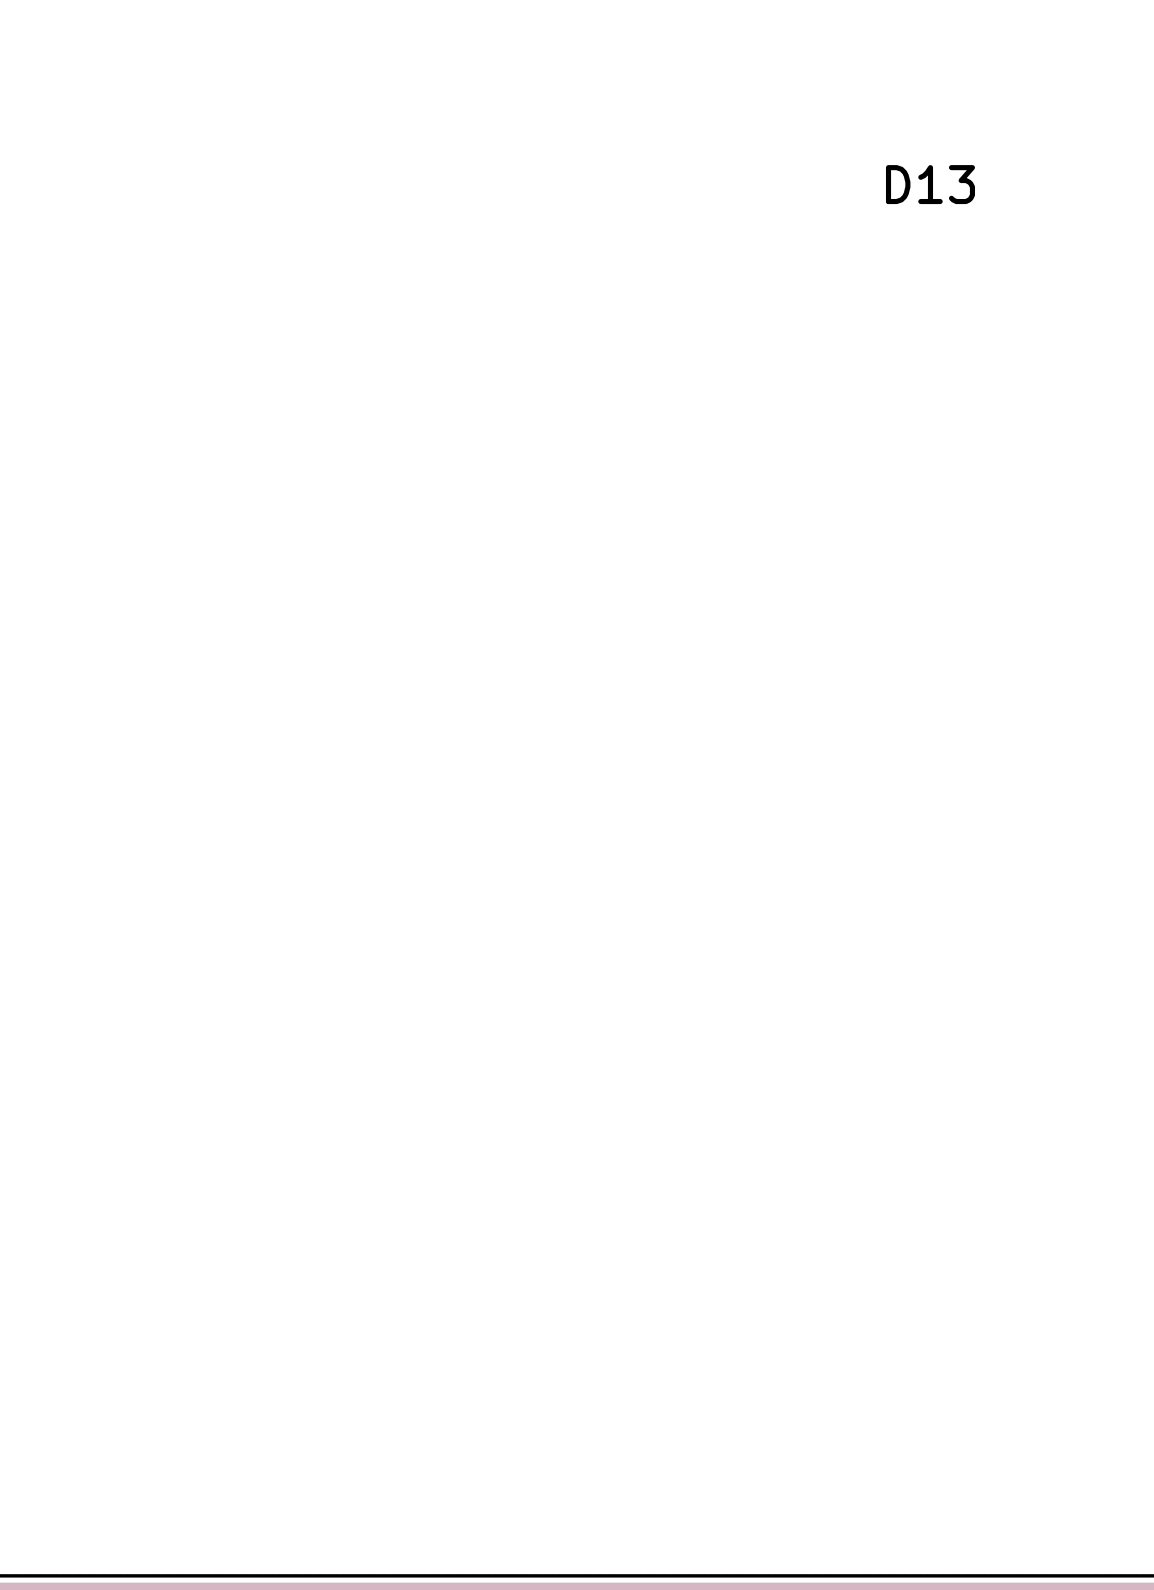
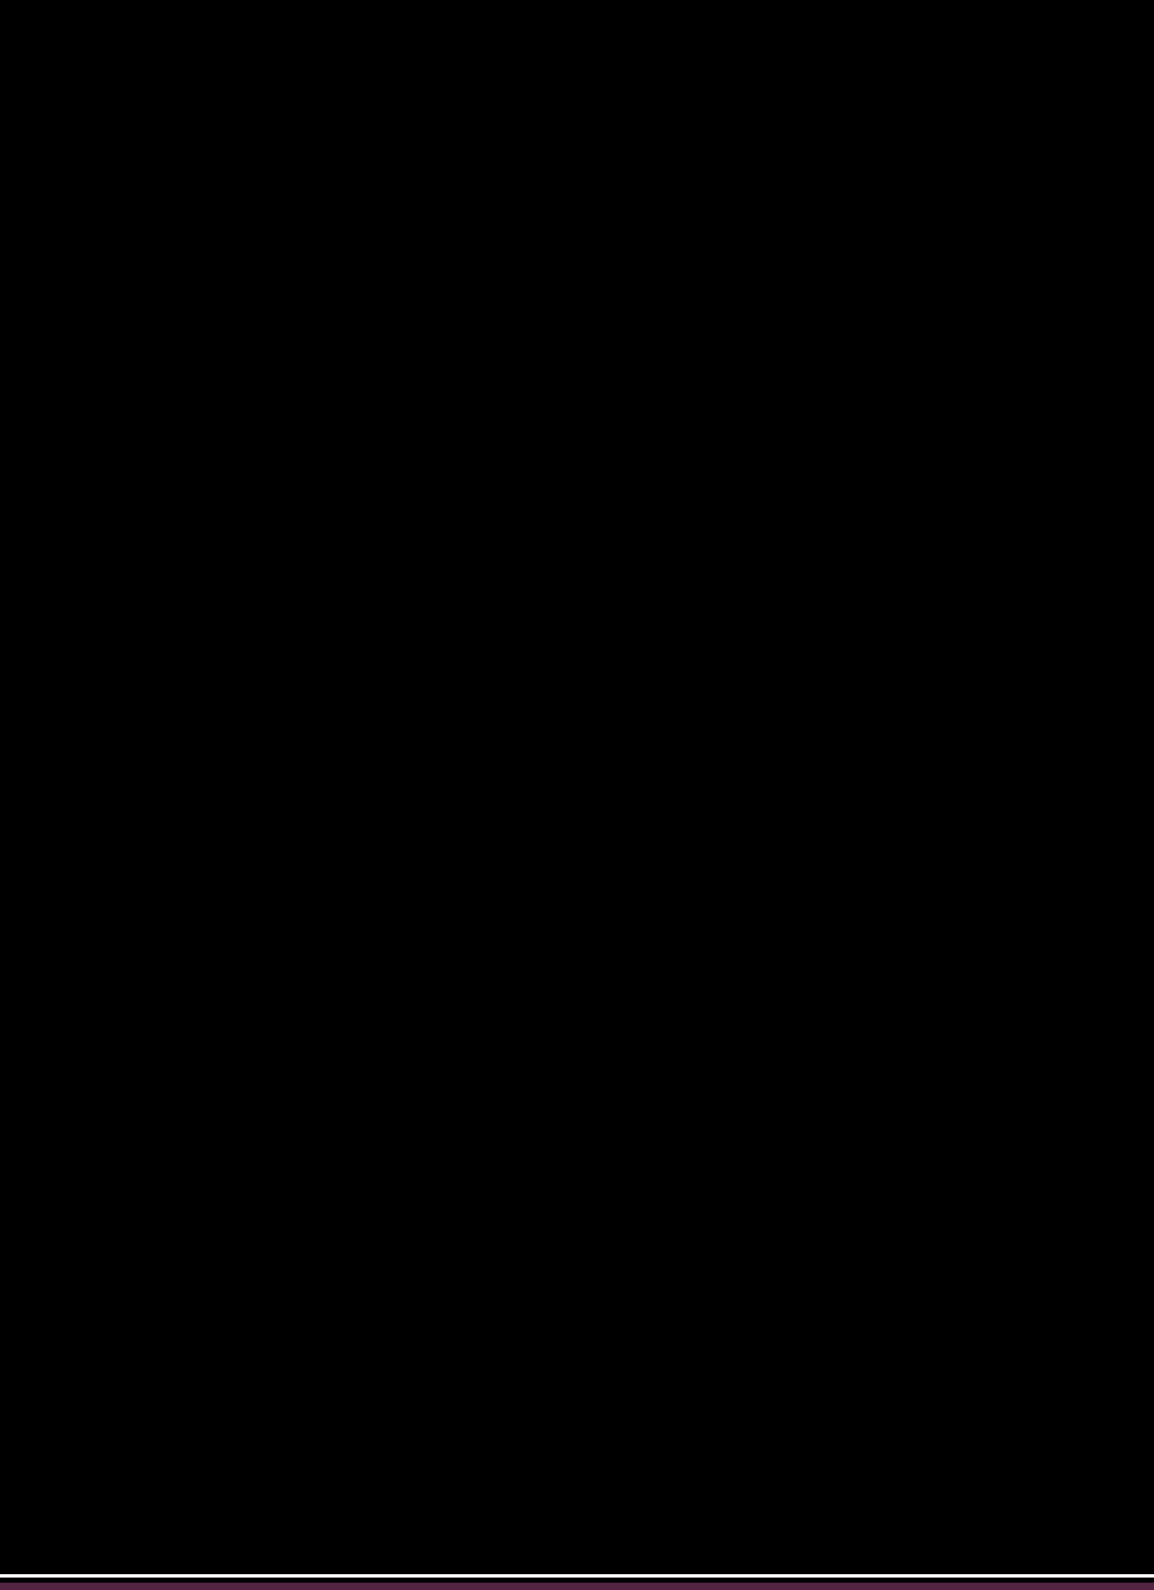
text: D13 (930, 184) -> none

